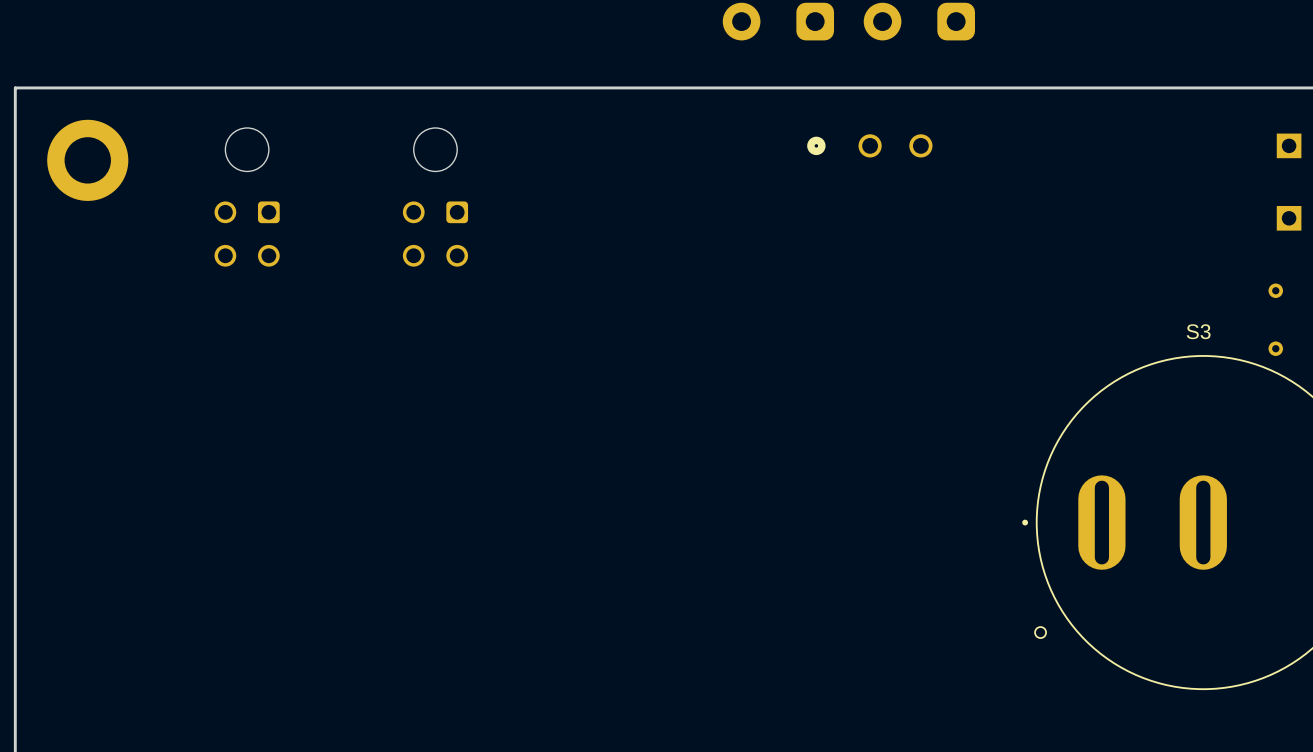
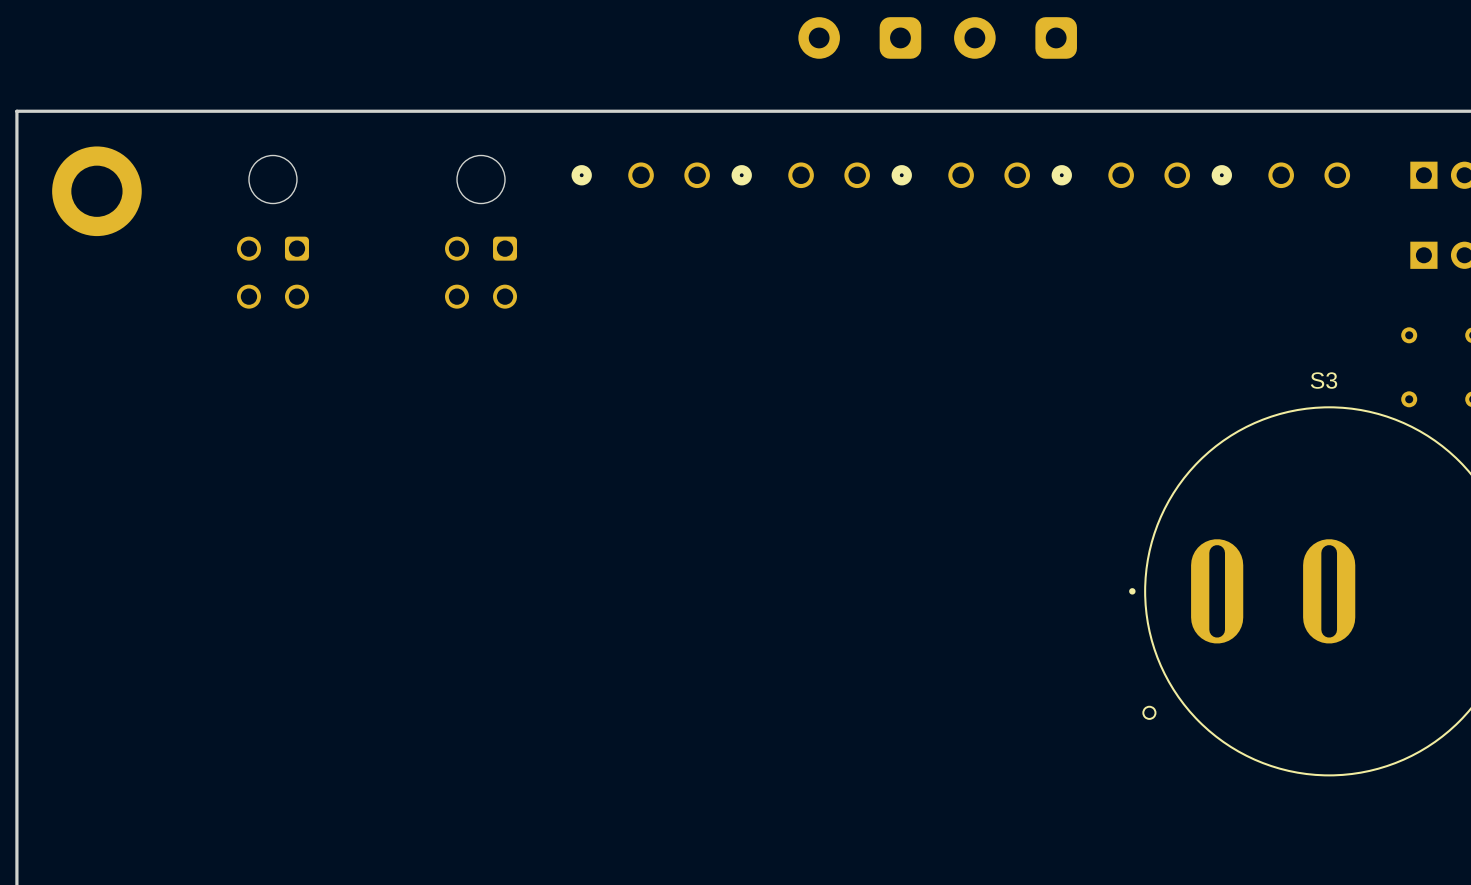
part: none -> (640, 175)
part: none -> (800, 175)
part: none -> (1120, 175)
part: none -> (1280, 175)

